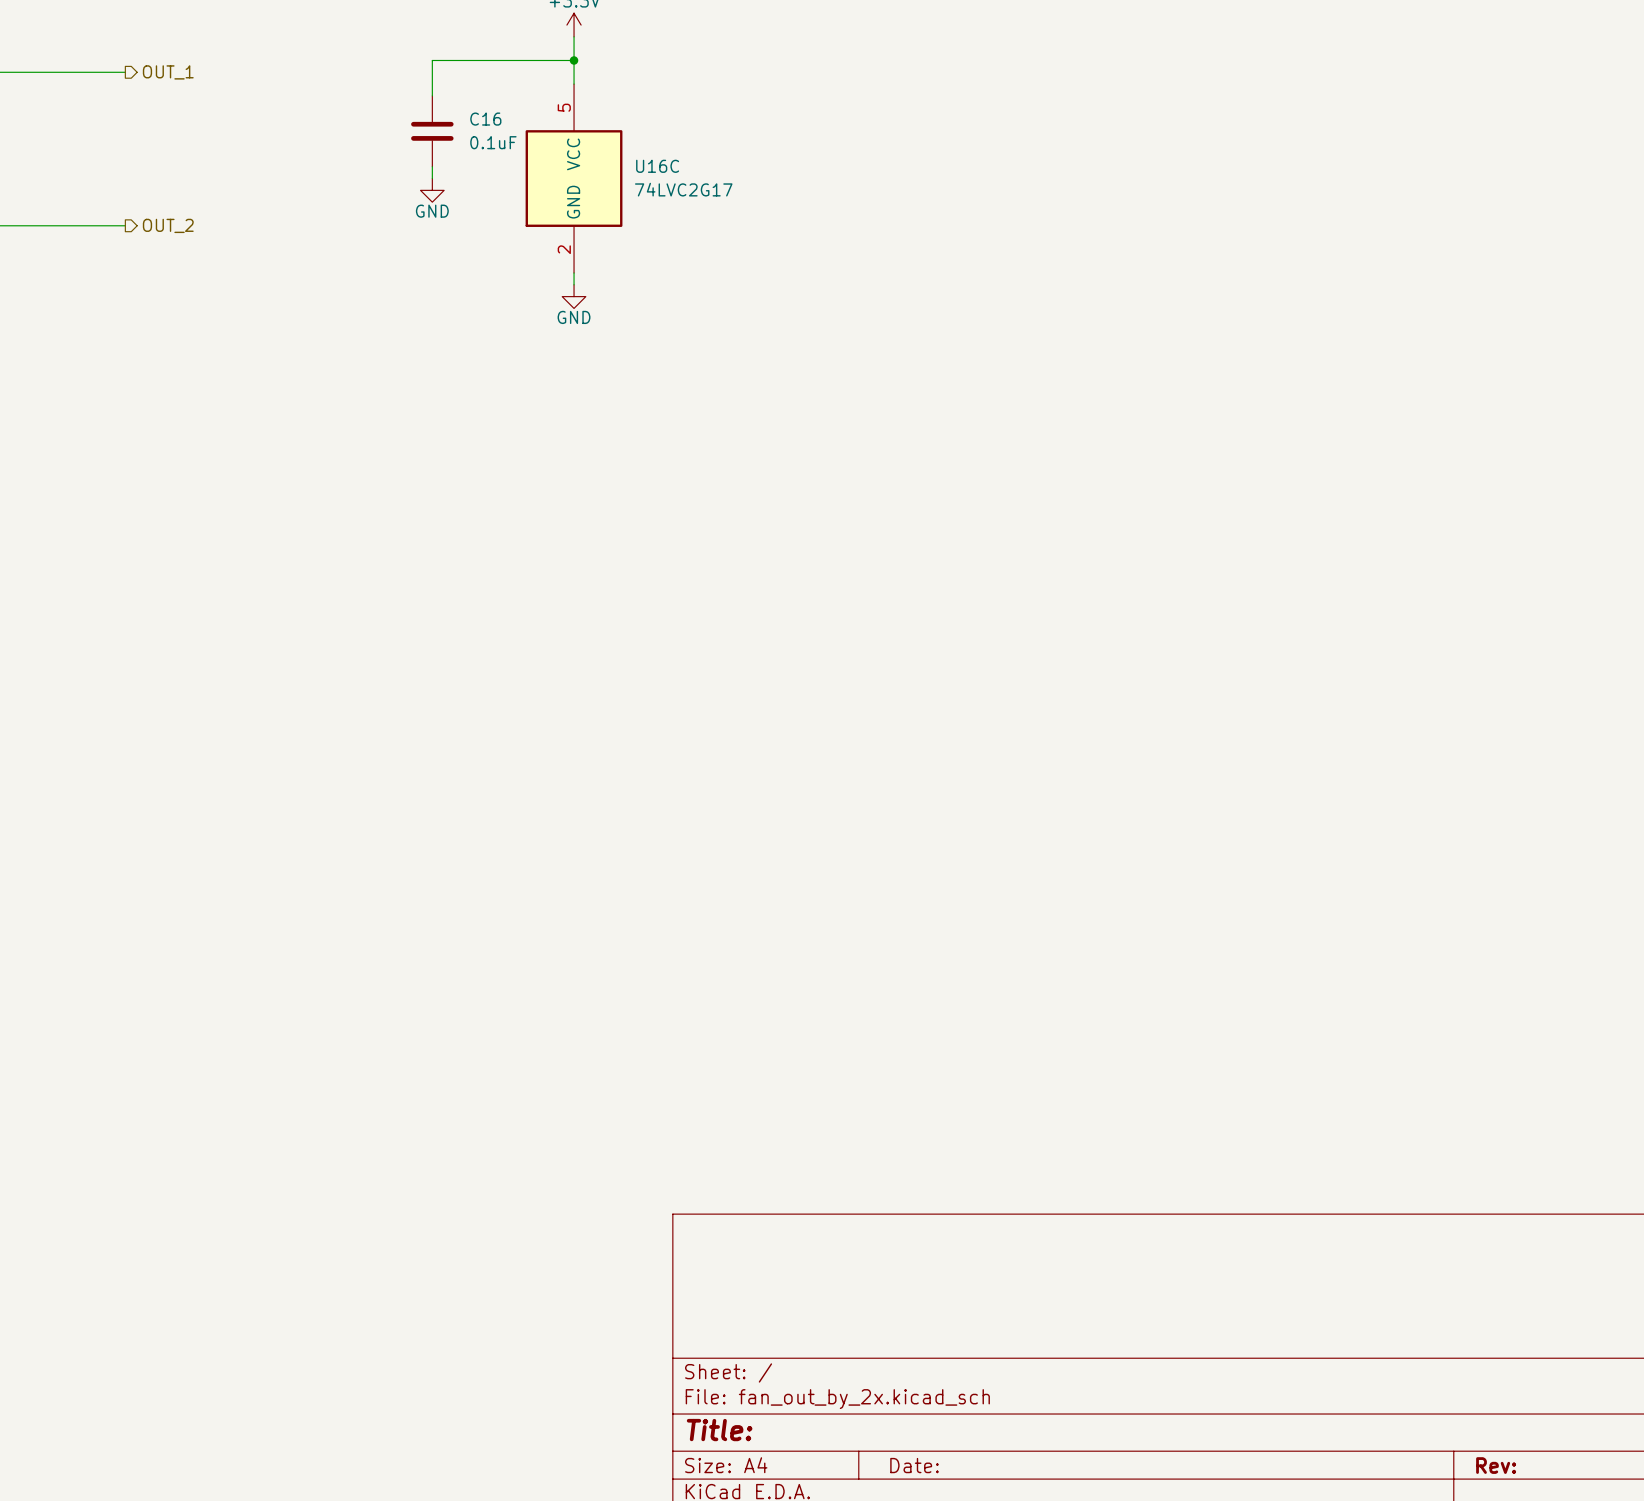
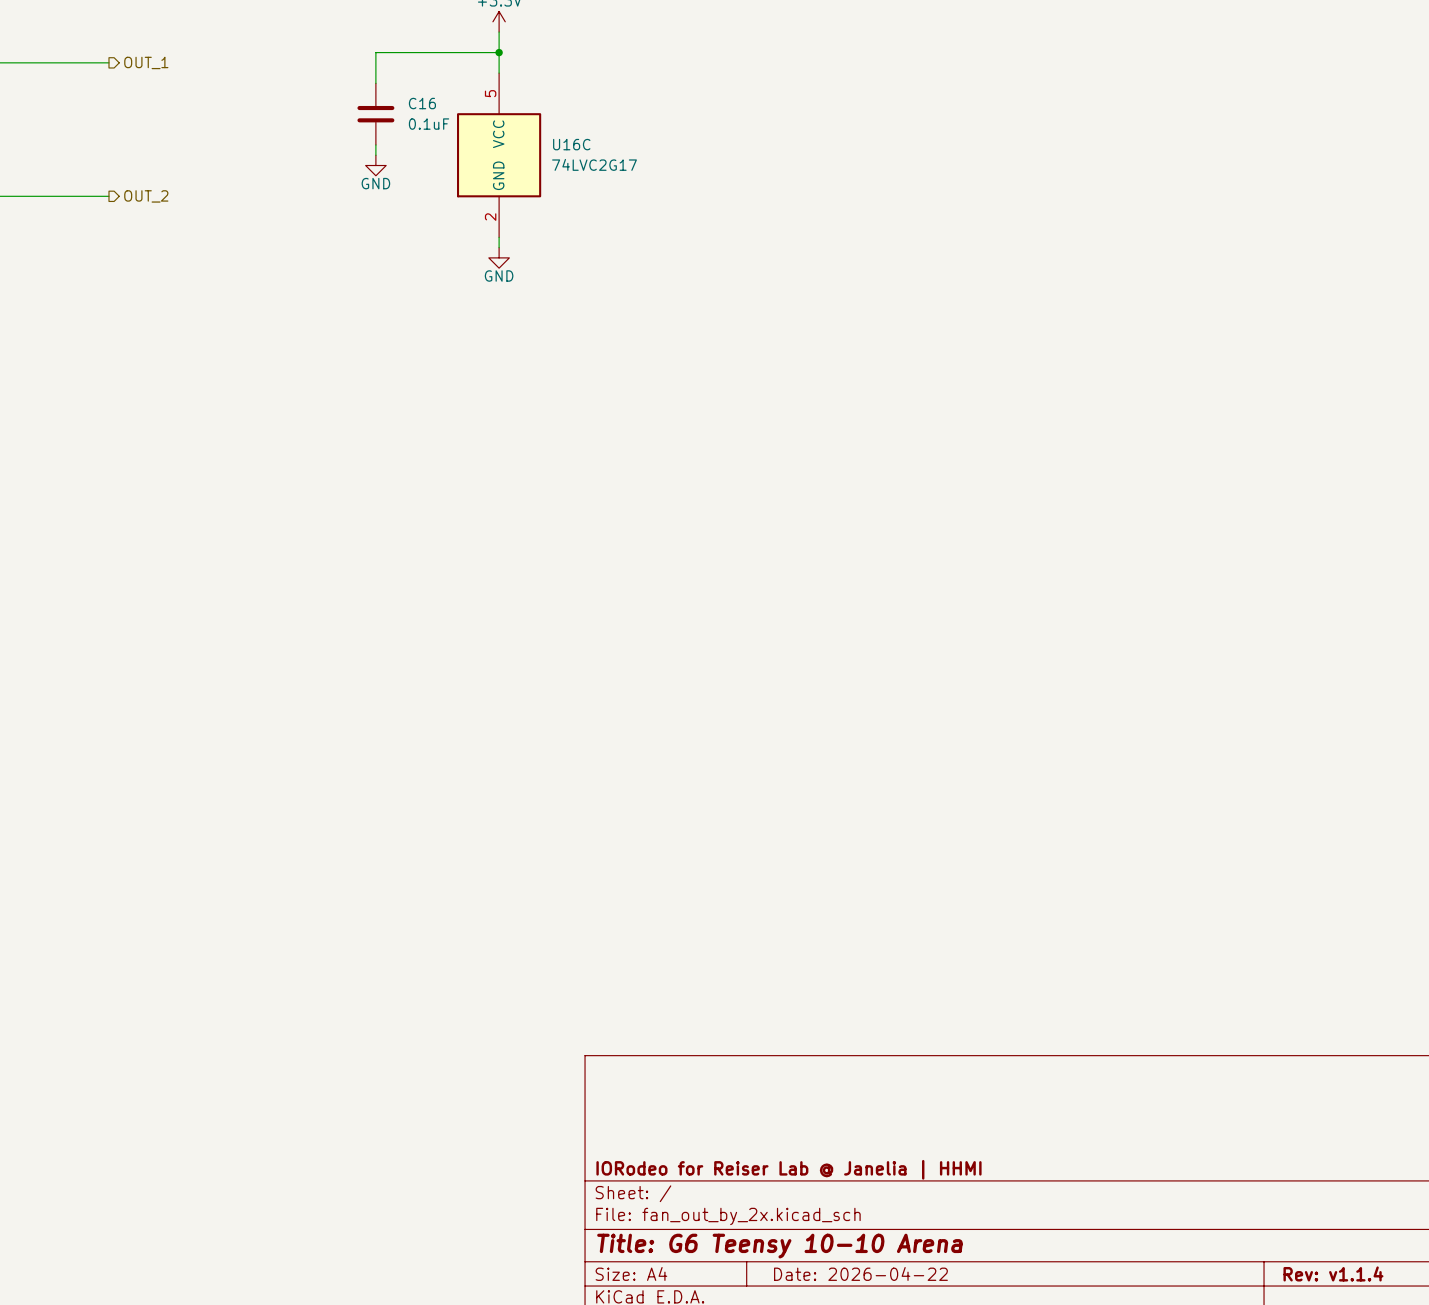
title block: none -> IORodeo for Reiser Lab @ Janelia | HHMI (788, 1169)
title block: Title: (719, 1430) -> Title: G6 Teensy 10-10 Arena (779, 1246)
title block: Date: (914, 1465) -> Date: 2026-04-22 (860, 1273)
title block: Rev: (1496, 1465) -> Rev: v1.1.4 (1333, 1273)

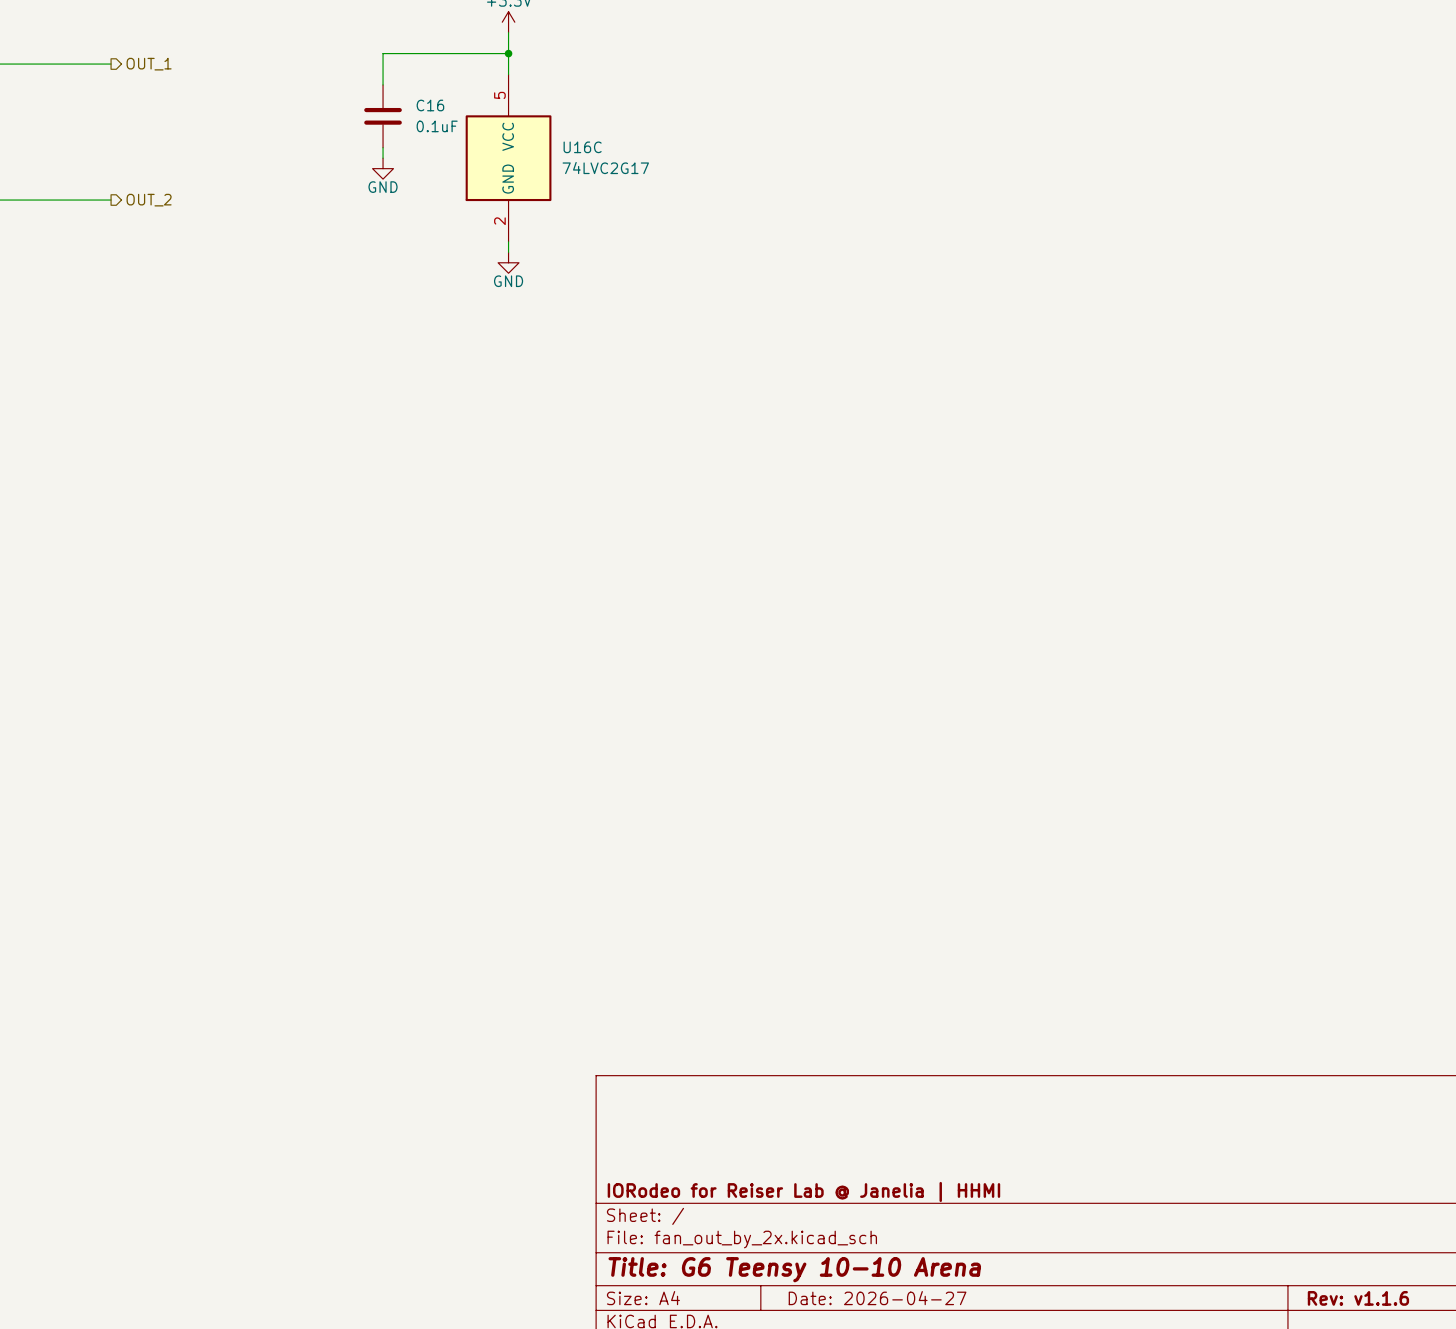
title block: Date: 2026-04-22 (860, 1273) -> Date: 2026-04-27 (877, 1298)
title block: Rev: v1.1.4 (1333, 1273) -> Rev: v1.1.6 (1358, 1298)

